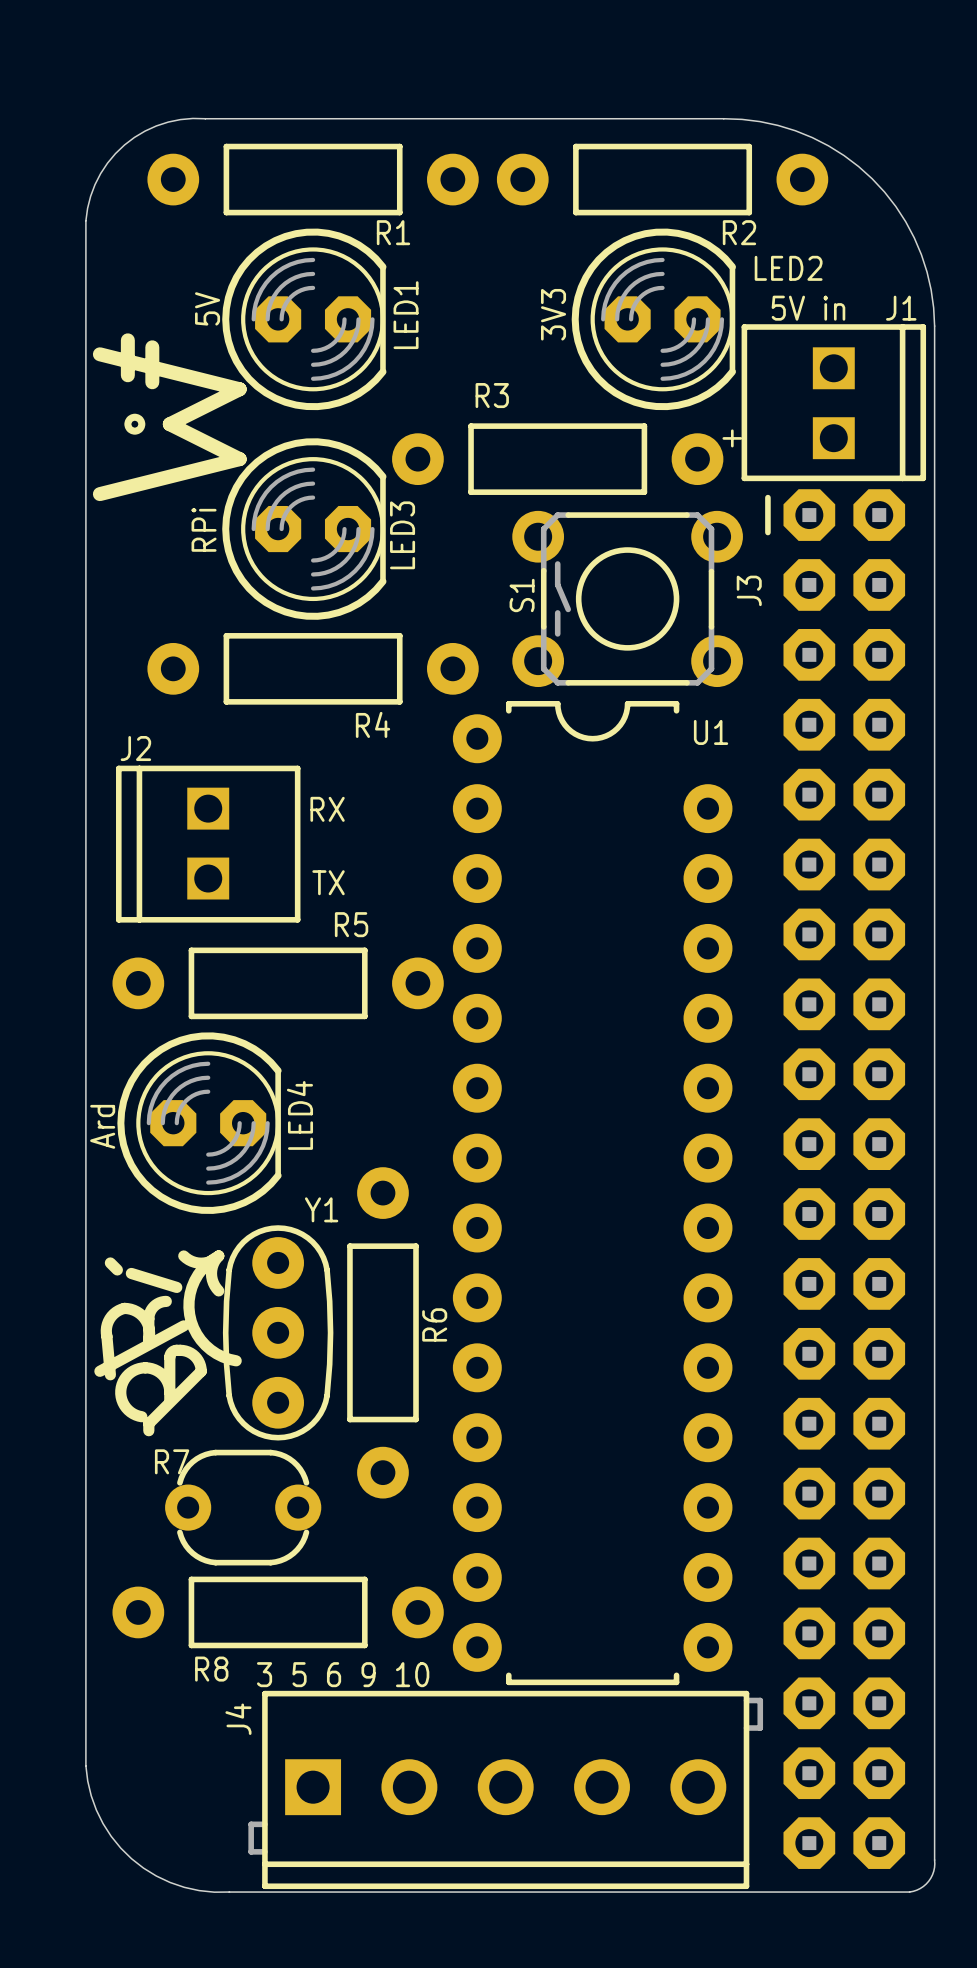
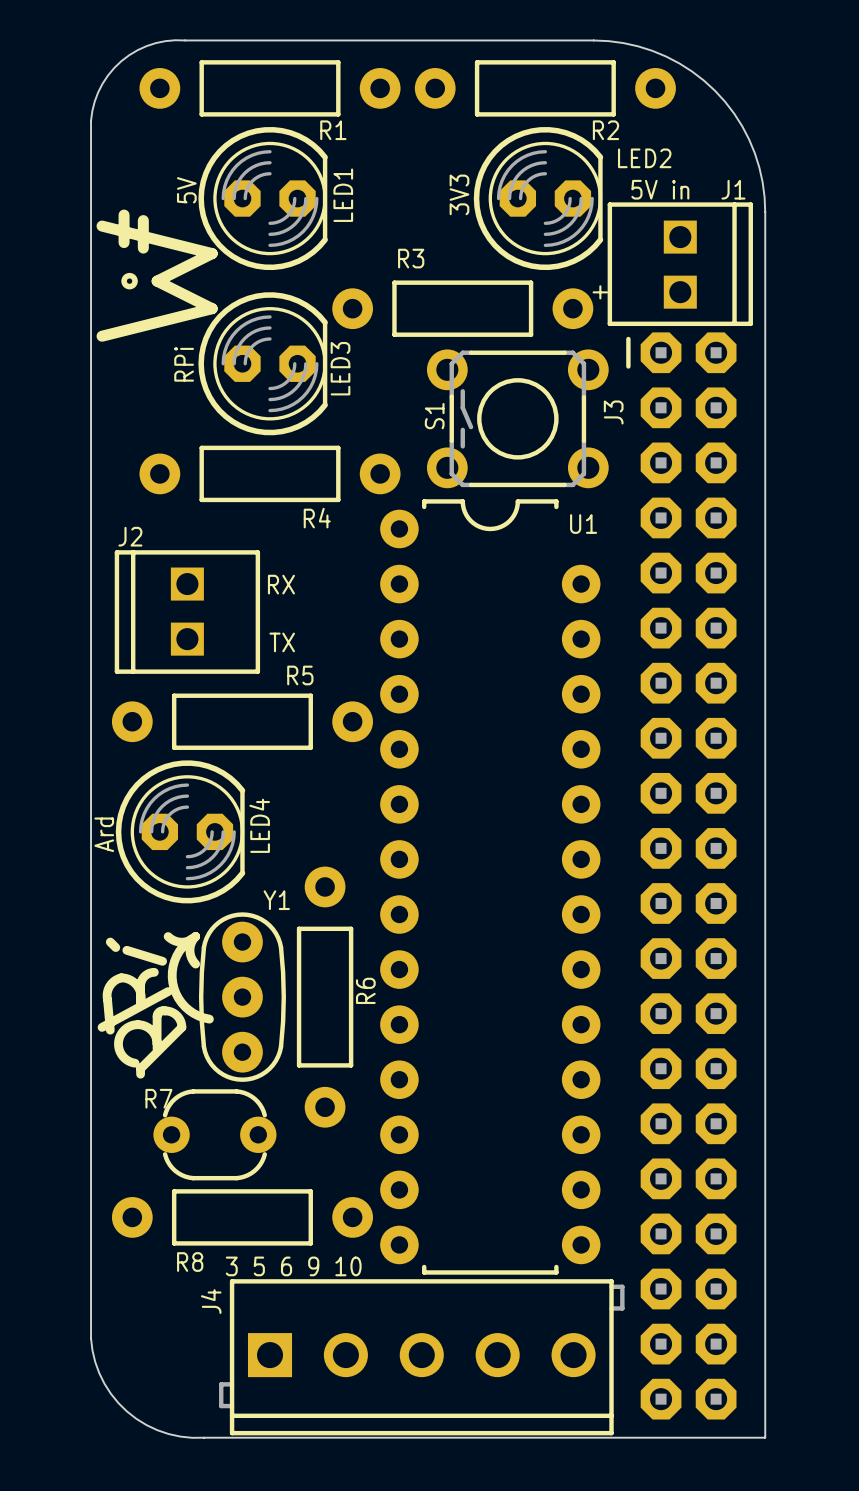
board edge: (723, 118) (760, 121) (795, 130) (828, 145) (858, 166) (884, 192) (895, 206) (914, 237) (927, 271) (933, 307) (934, 1863) (928, 1881) (920, 1888) (909, 1892) -> (593, 40) (623, 43) (652, 50) (679, 63) (703, 80) (725, 101) (742, 126) (754, 153) (764, 197) (765, 1437) (740, 1437)

